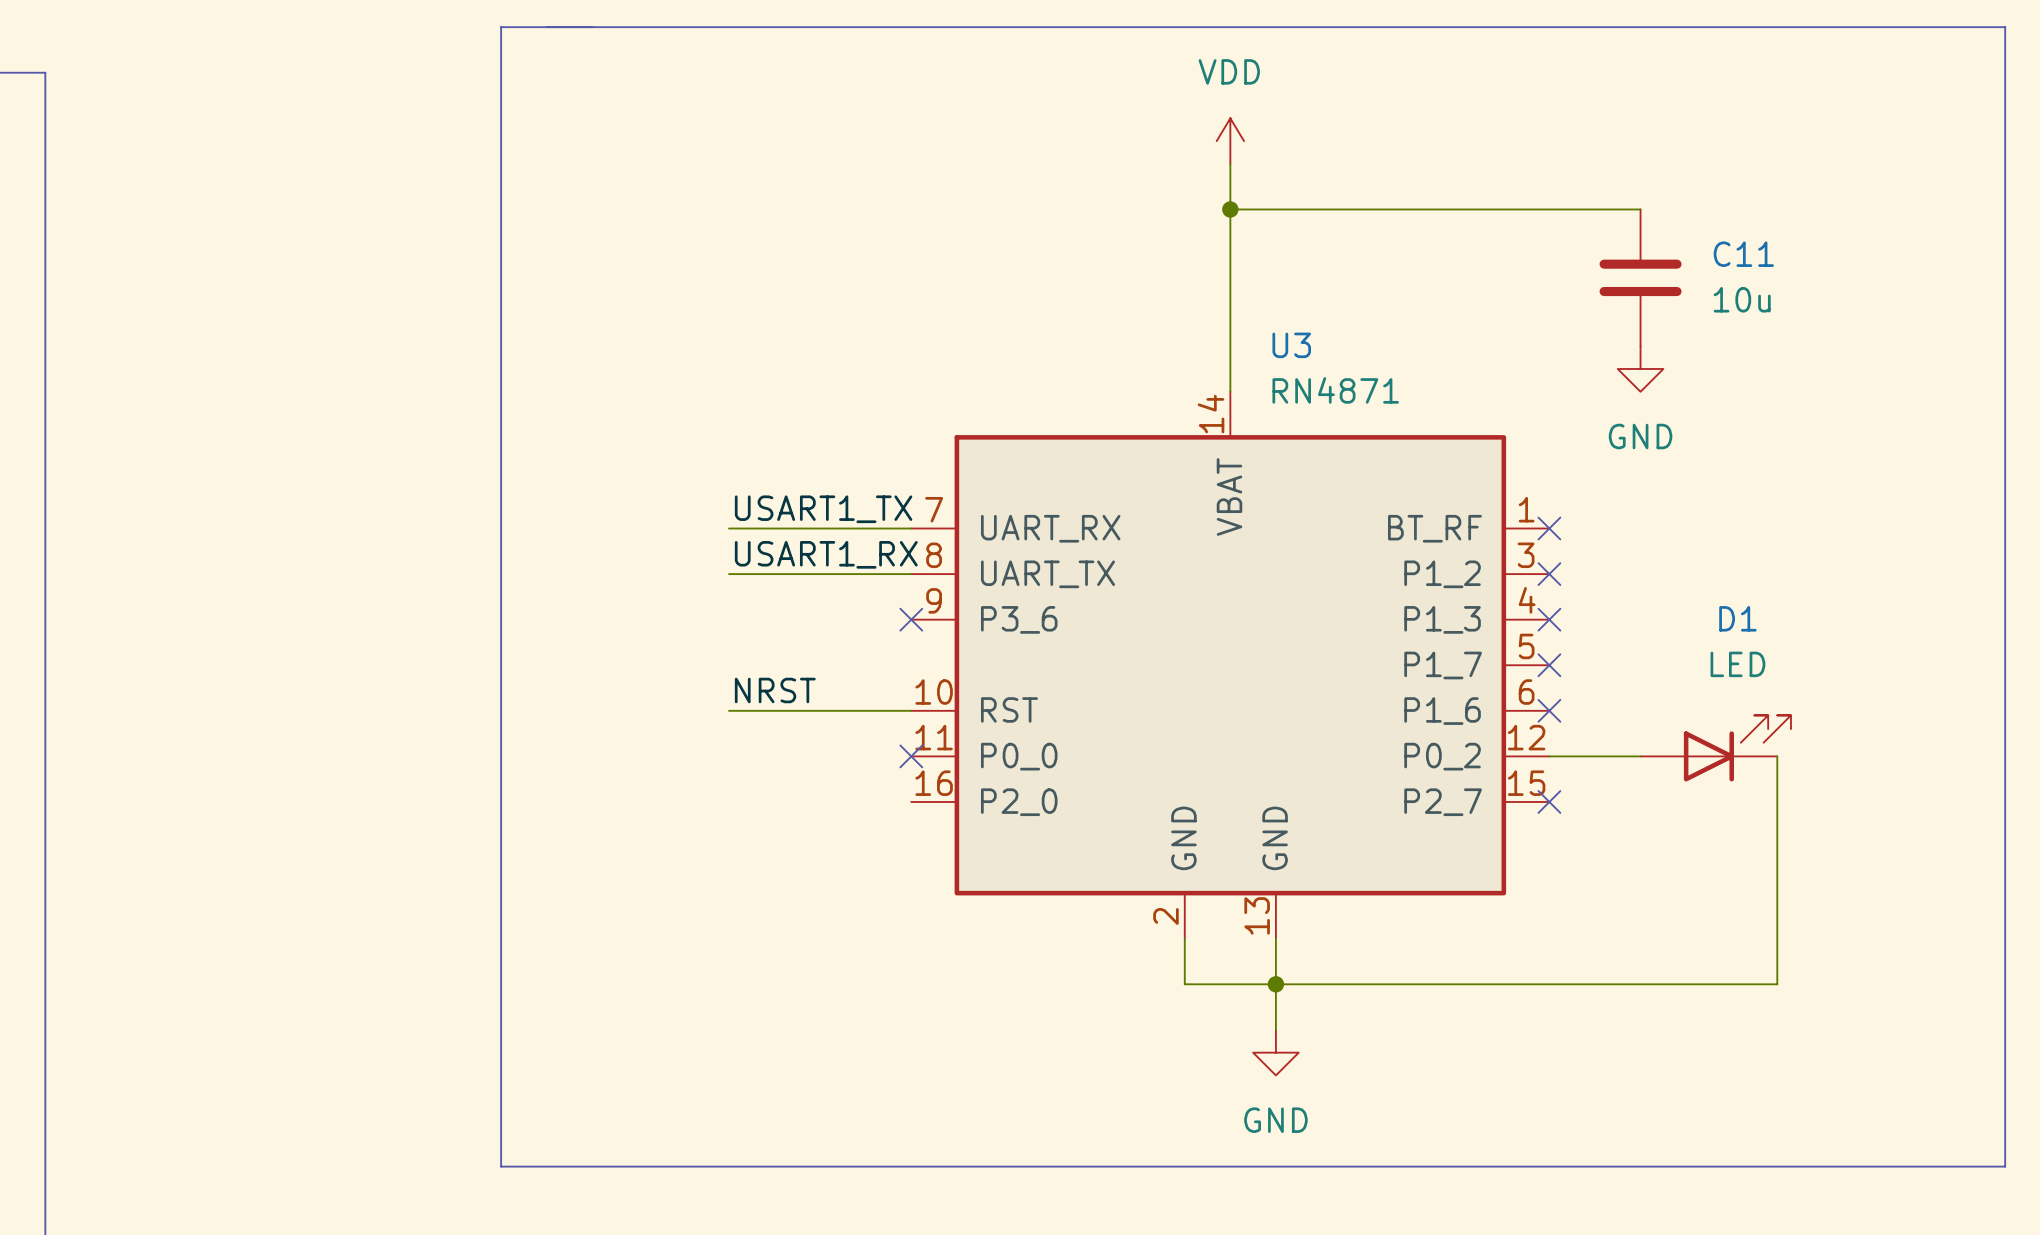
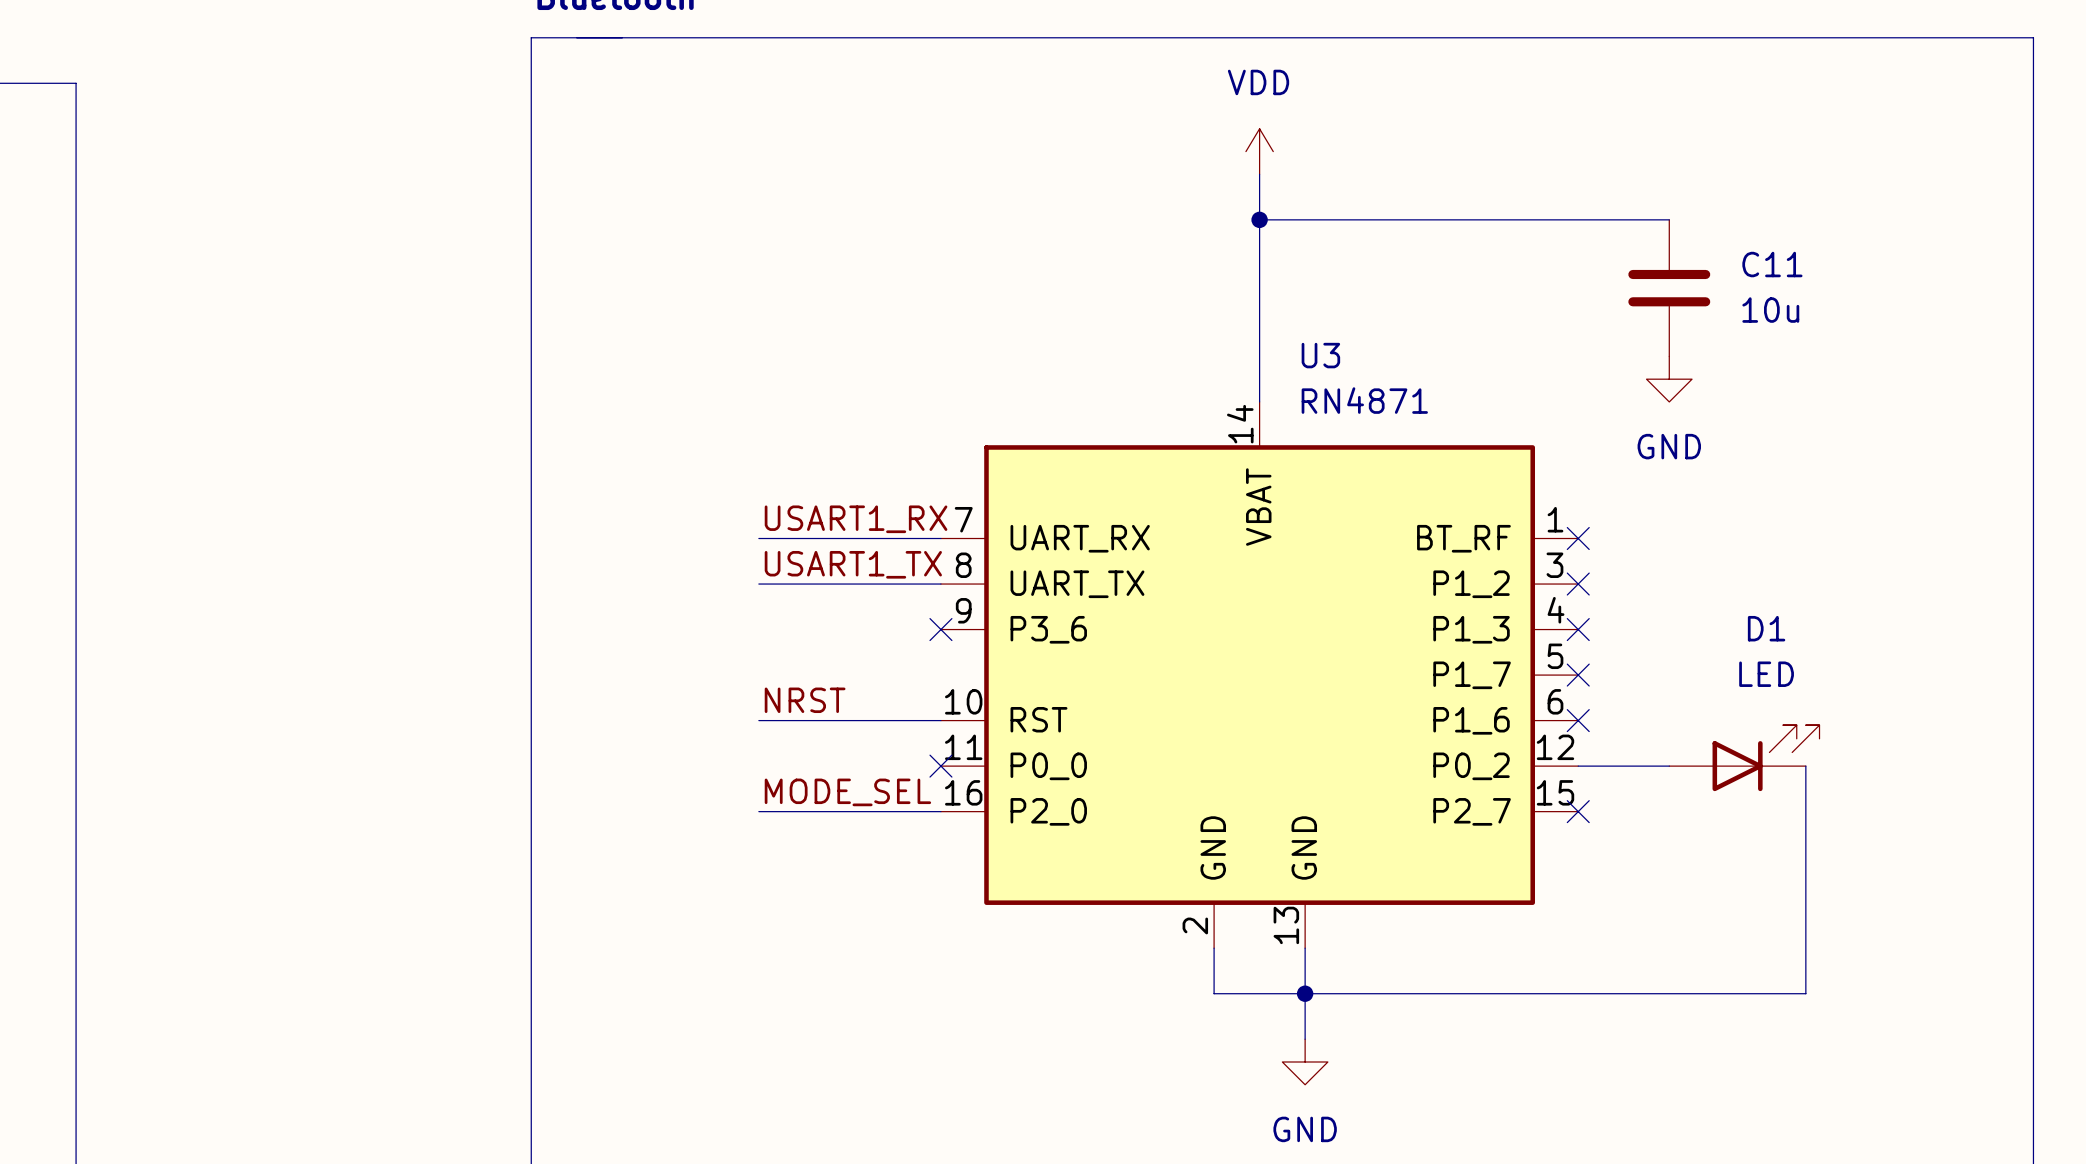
label: USART1_TX (823, 509) -> USART1_RX (856, 519)
label: USART1_RX (826, 554) -> USART1_TX (853, 564)
label: none -> MODE_SEL (847, 792)
wire: none -> (758, 811) (940, 811)

